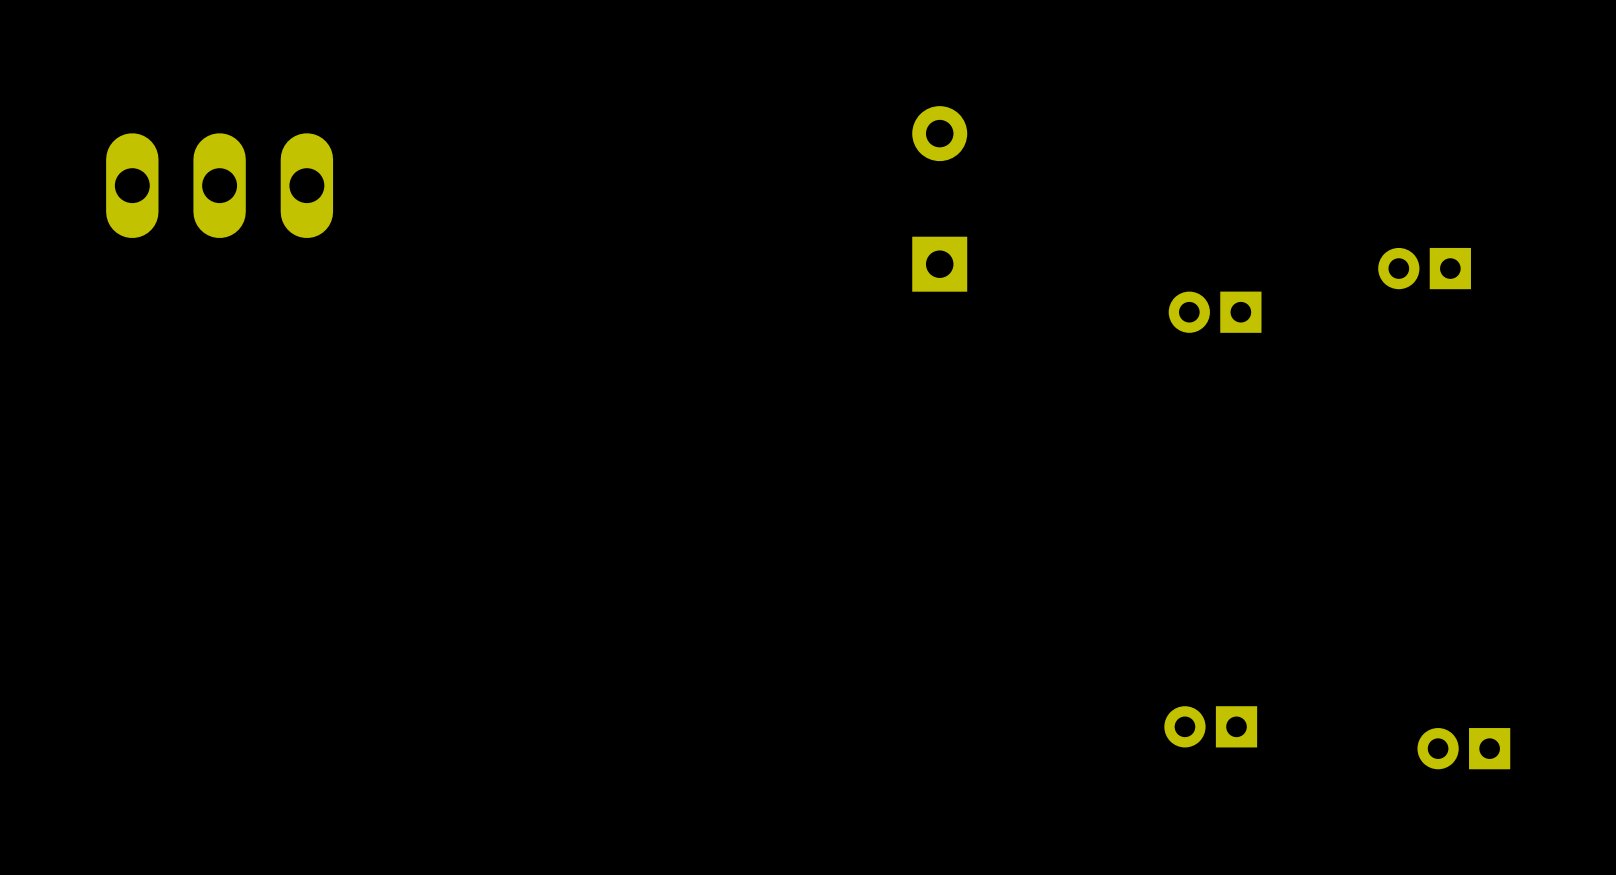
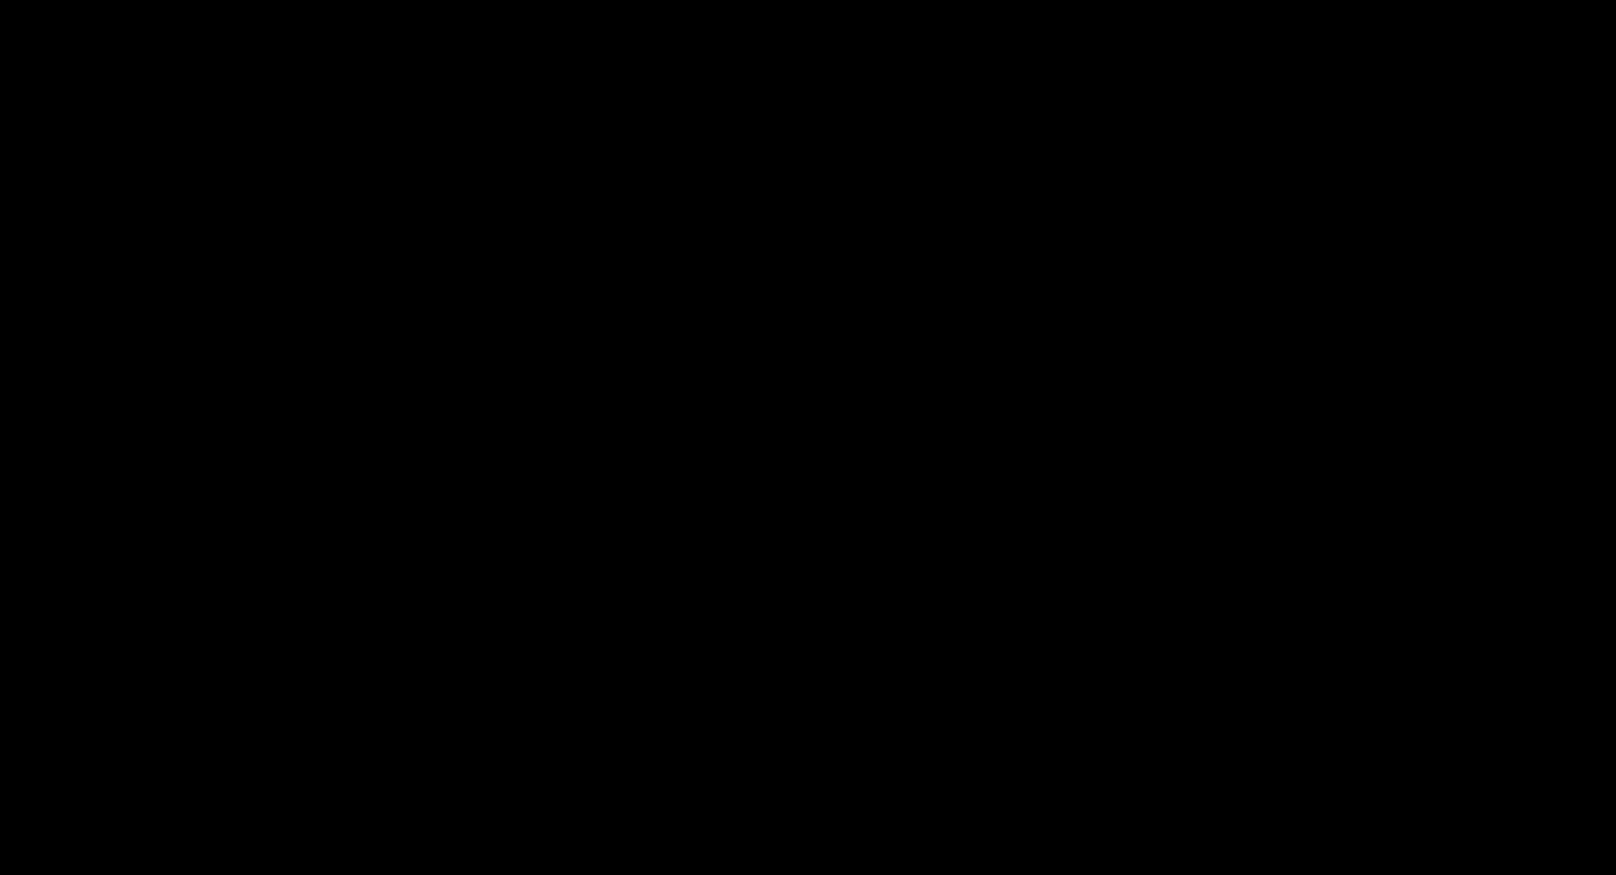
part: (219, 185) -> none
part: (939, 198) -> none
part: (1424, 268) -> none
part: (1215, 312) -> none
part: (1210, 726) -> none
part: (1463, 748) -> none

